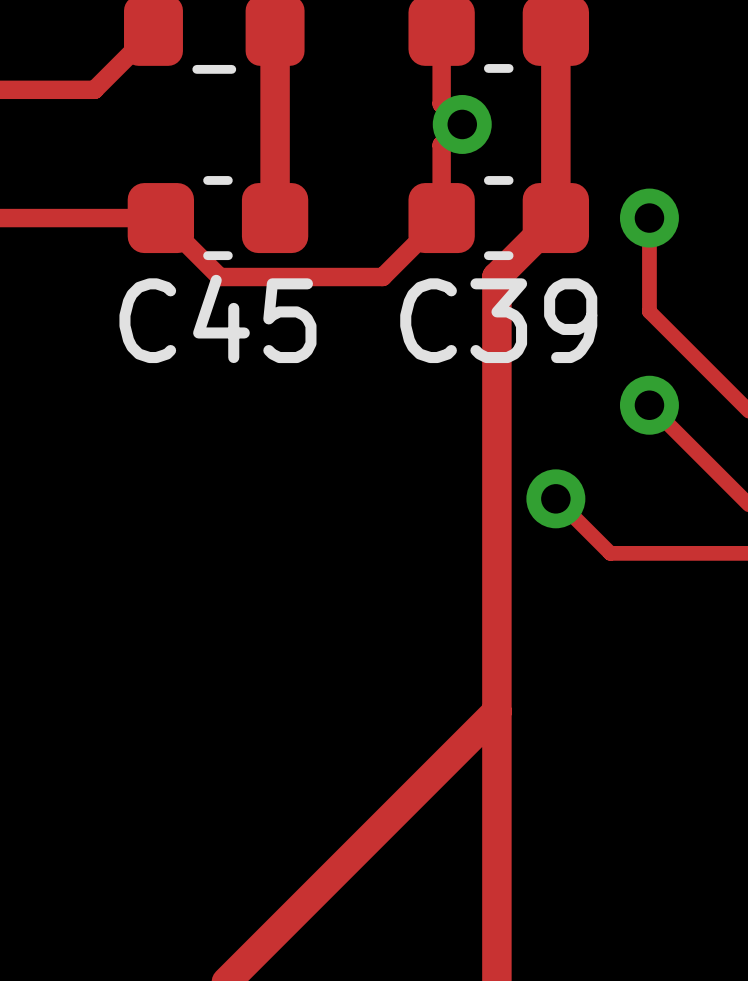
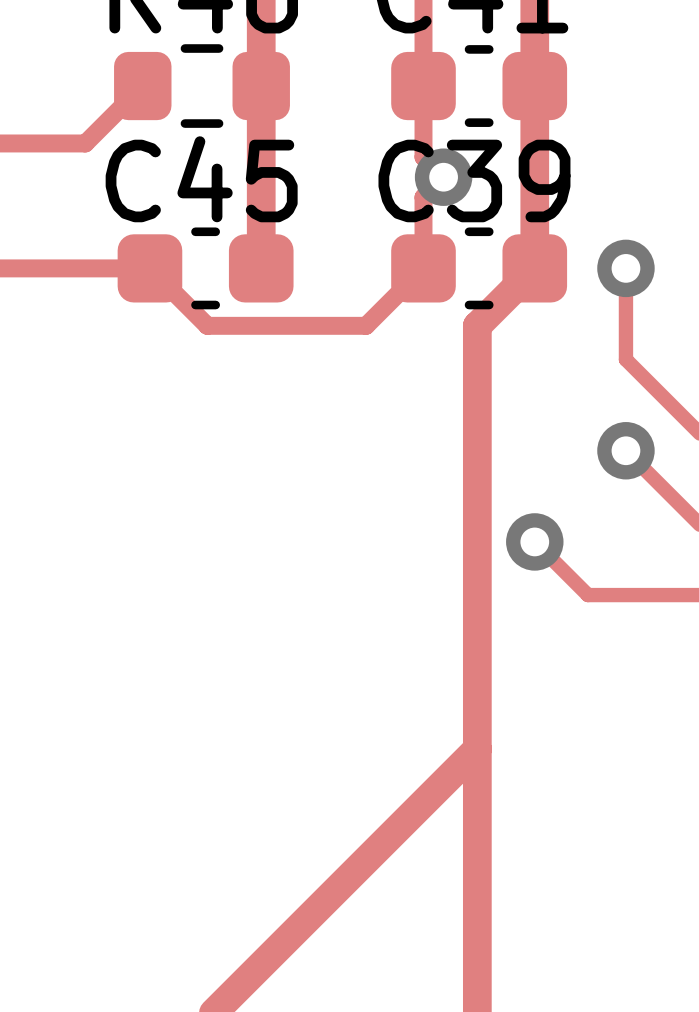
C45 name position: C45 (217, 318) -> C45 (201, 179)
C39 name position: C39 (498, 320) -> C39 (474, 180)

